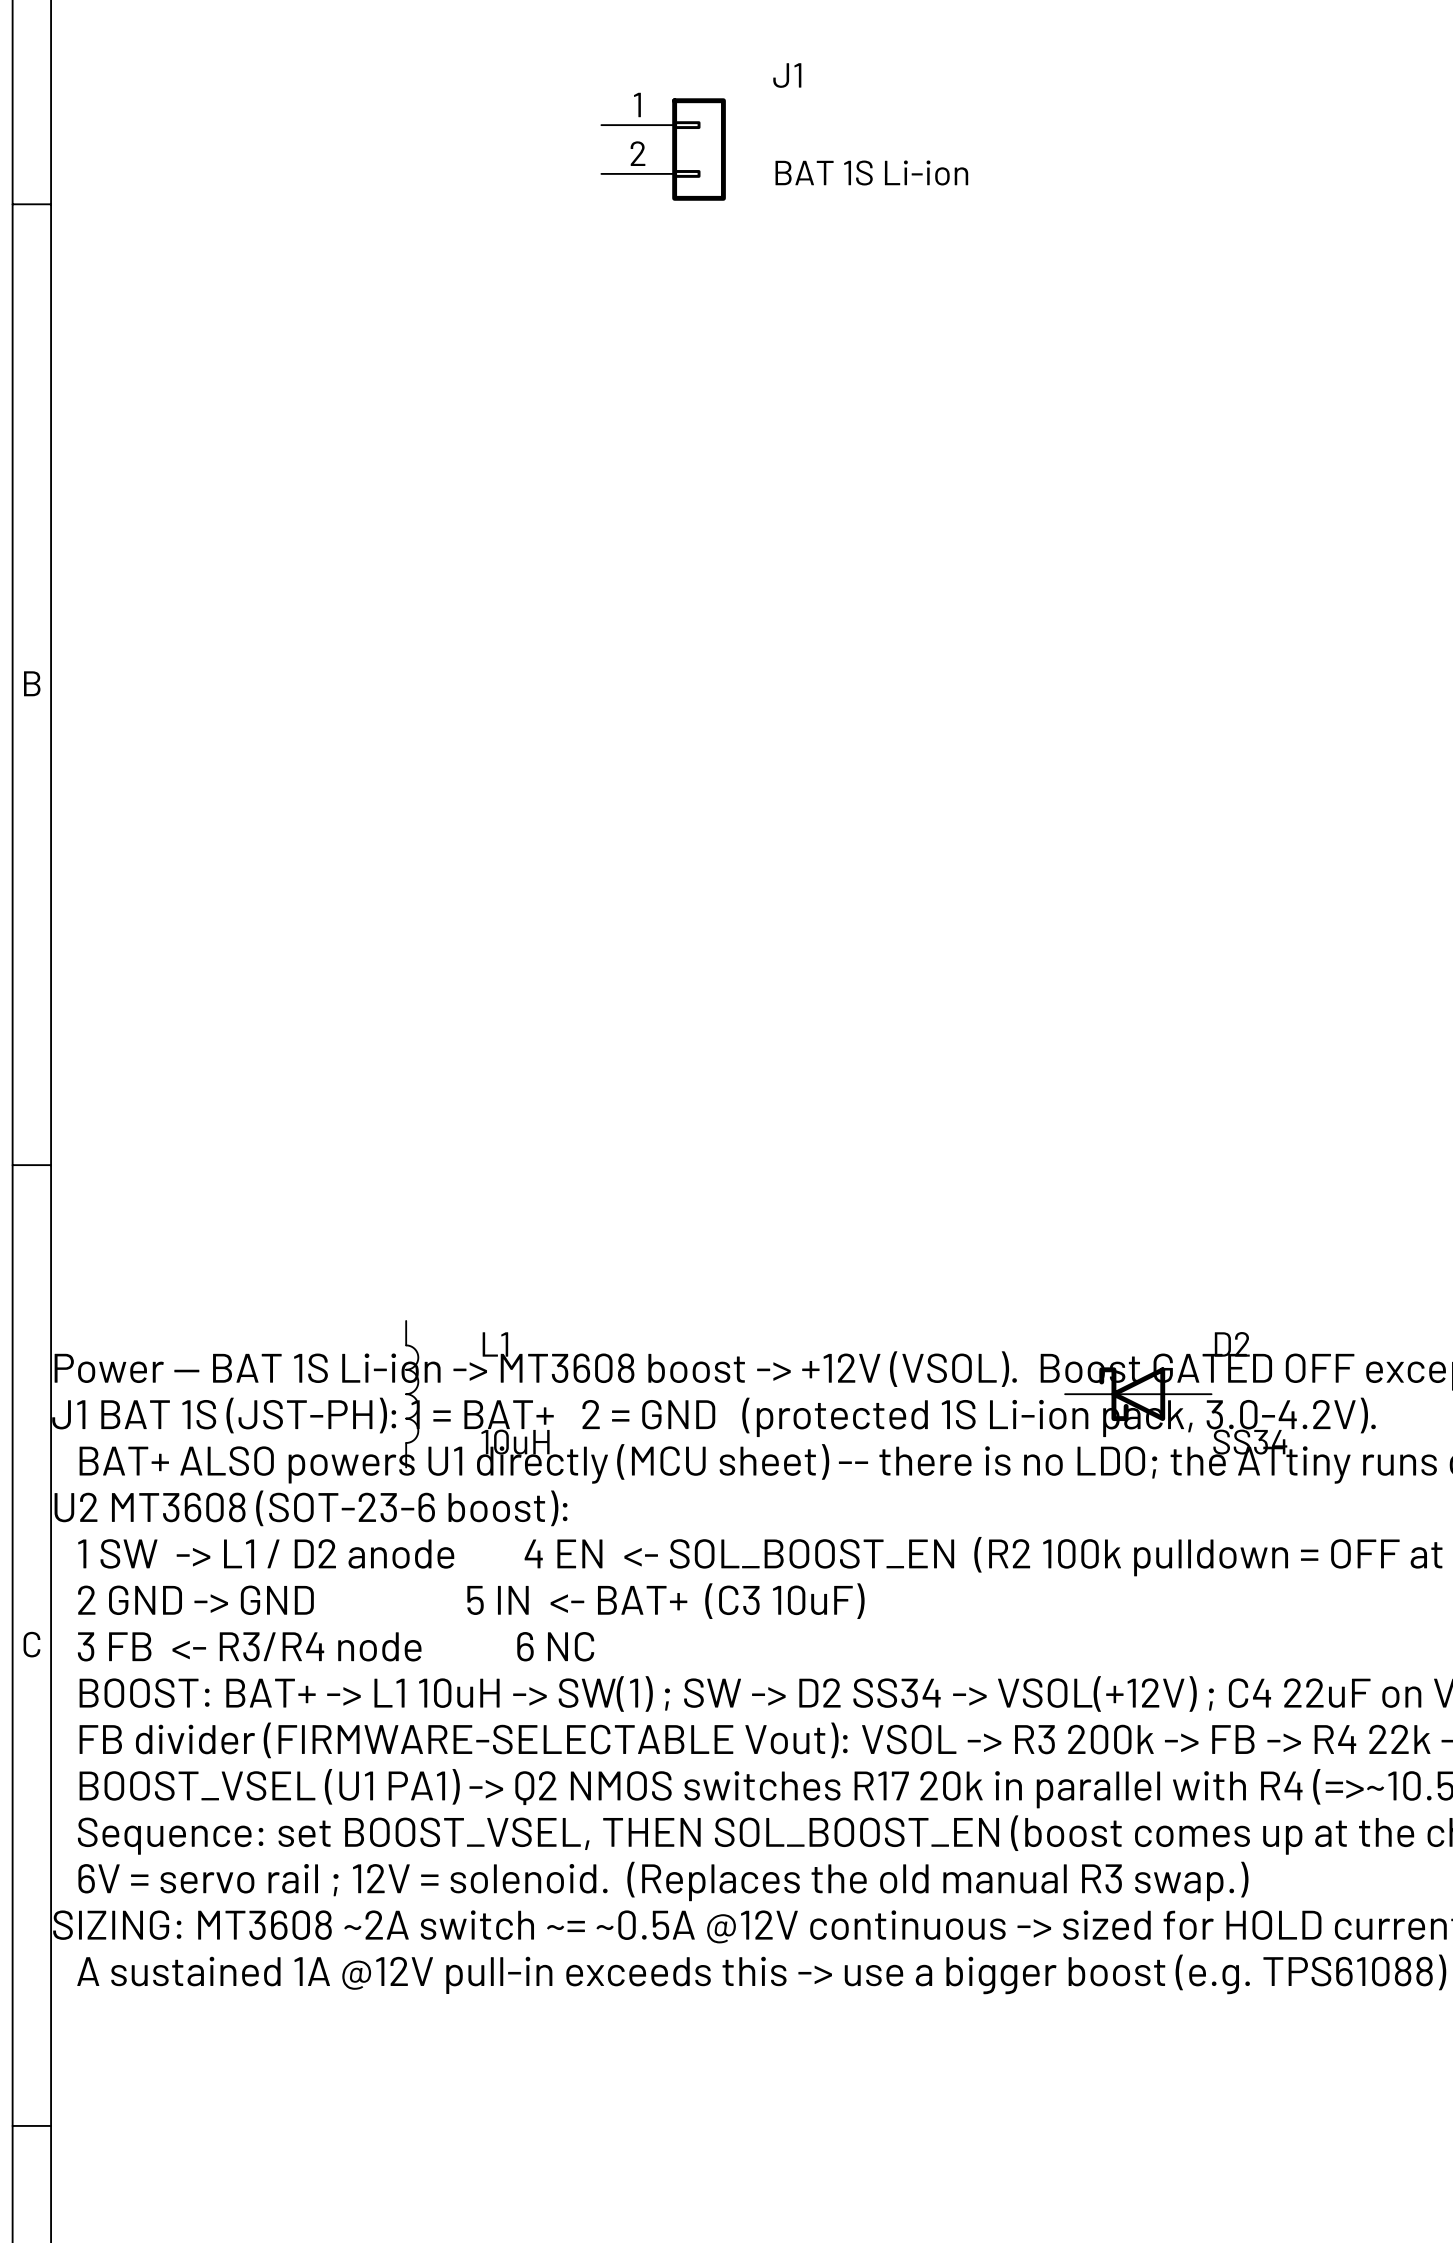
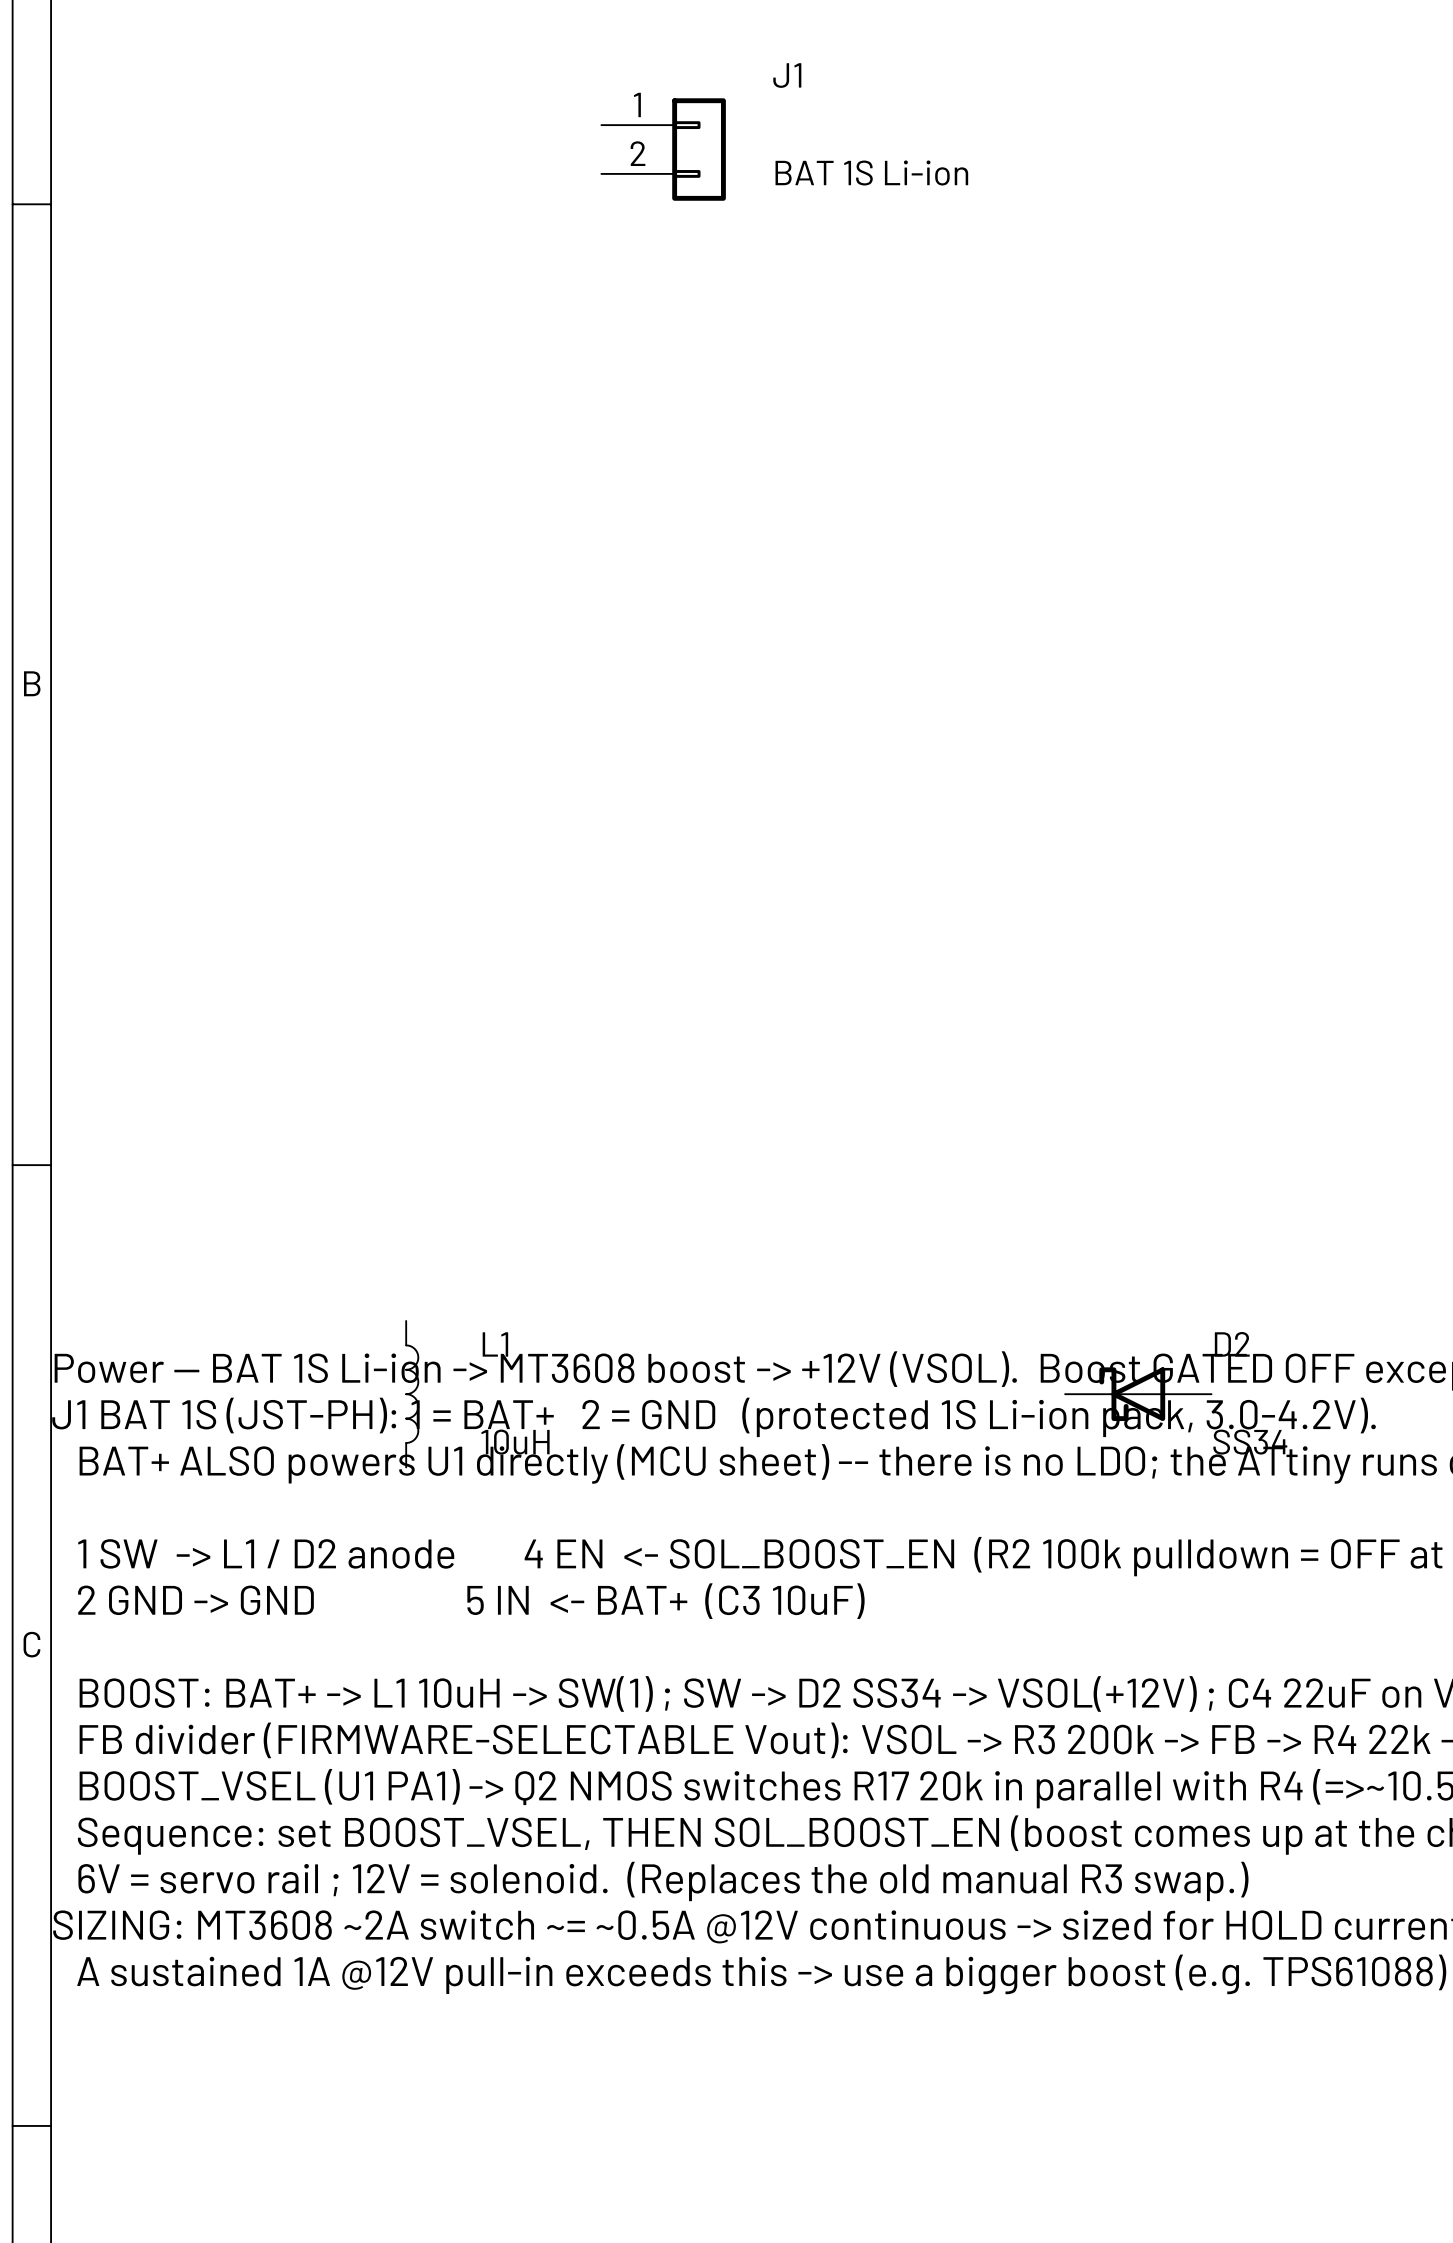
text: U2 MT3608 (SOT-23-6 boost): (311, 1508) -> none
text: 3 FB <- R3/R4 node 6 NC (336, 1646) -> none

